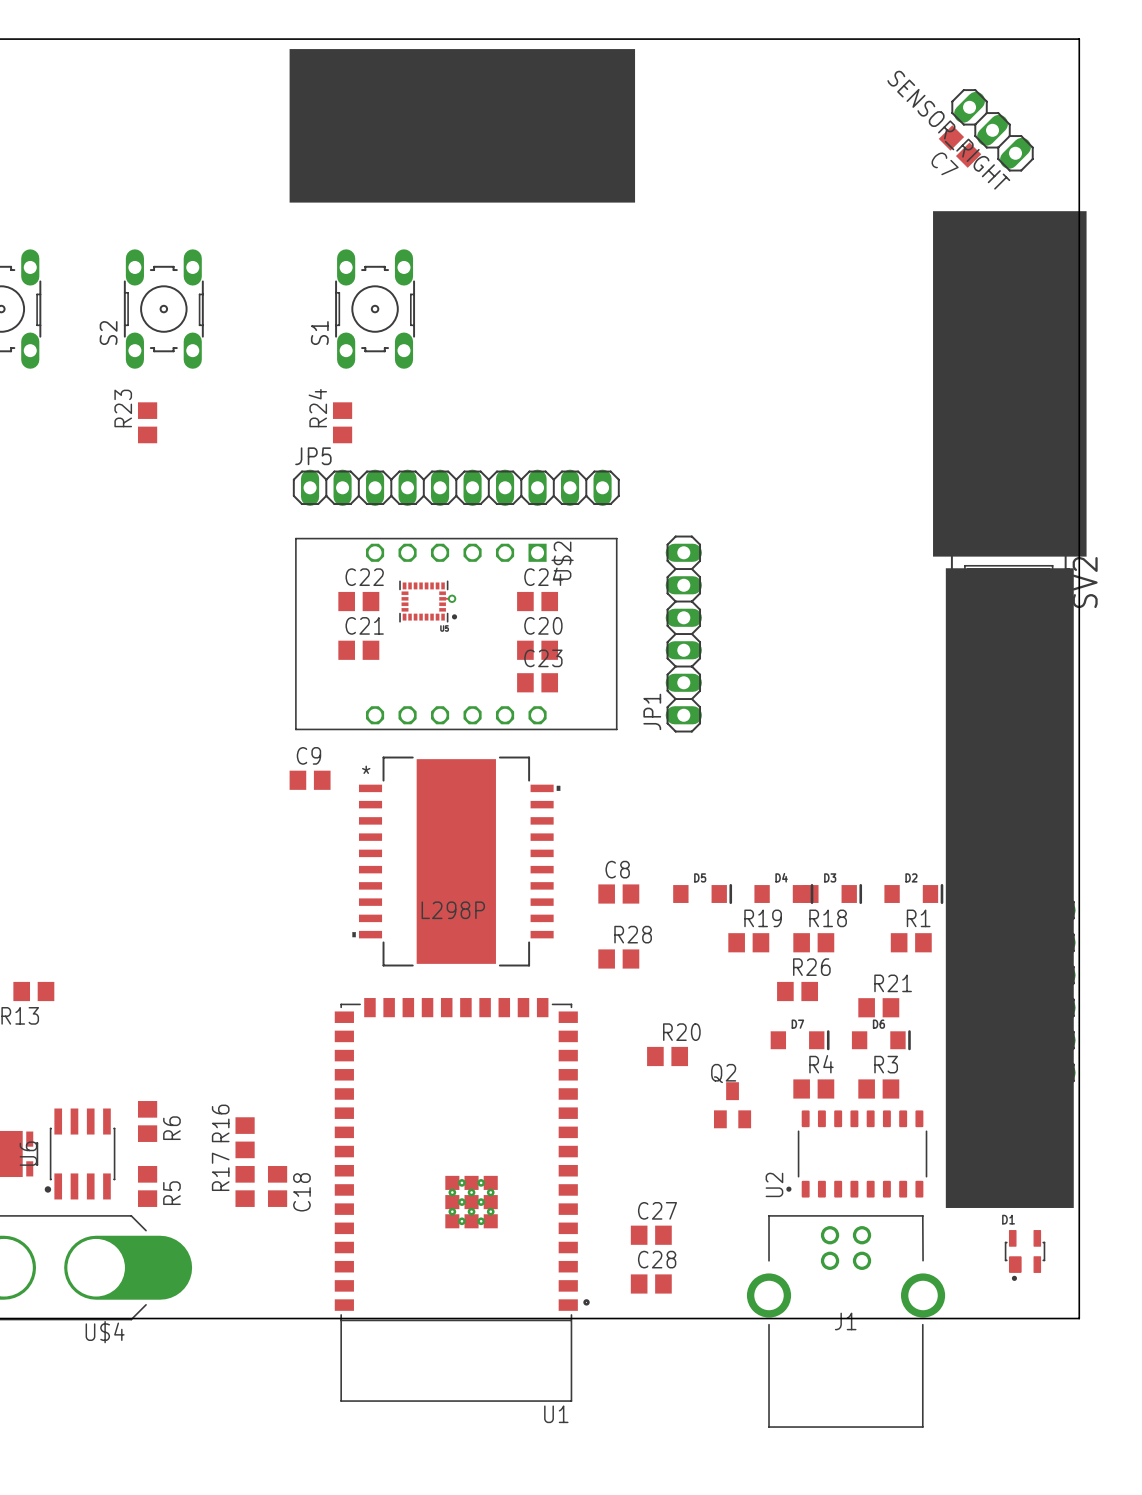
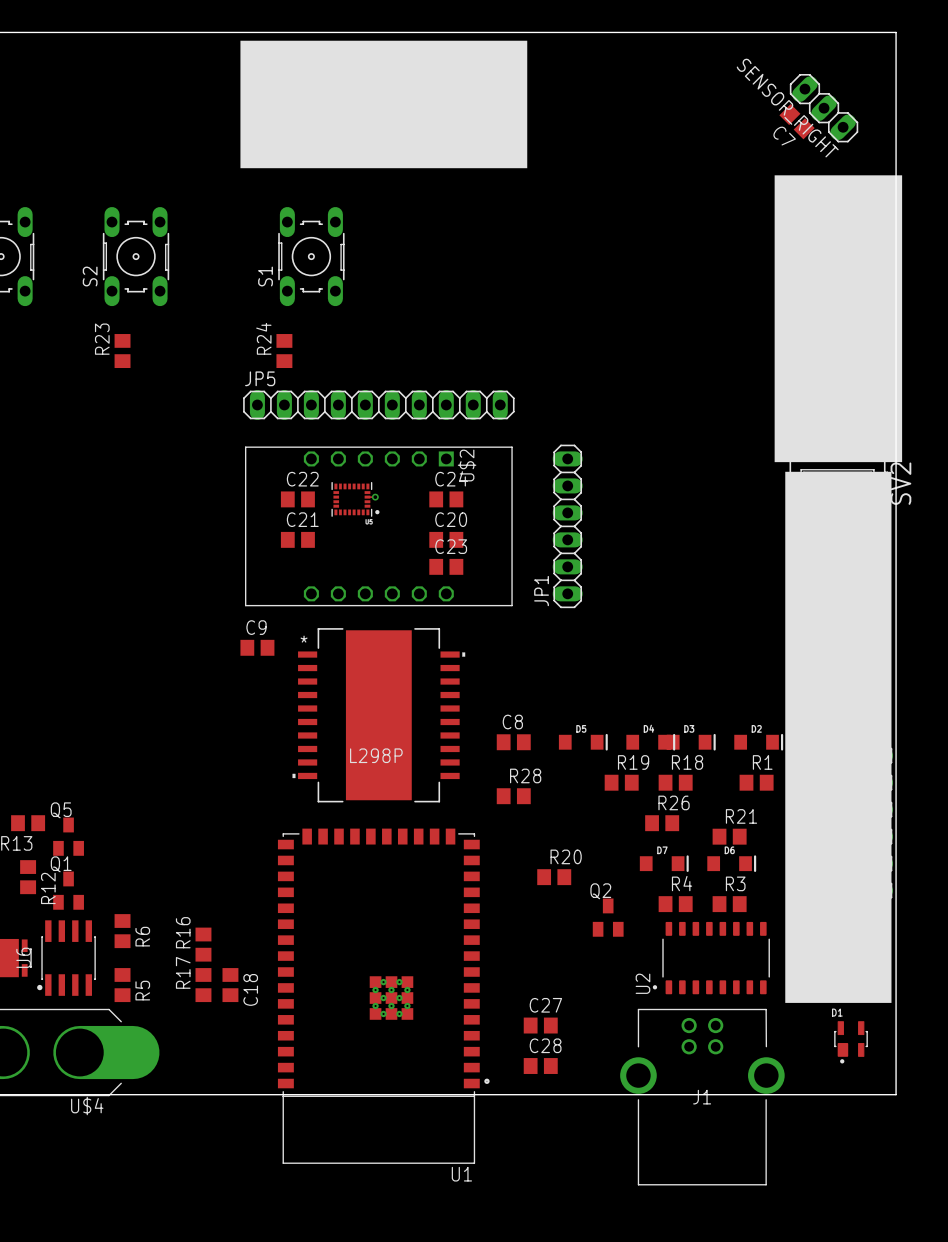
Q5: none -> (68, 836)
R12: none -> (28, 877)
Q1: none -> (68, 890)

